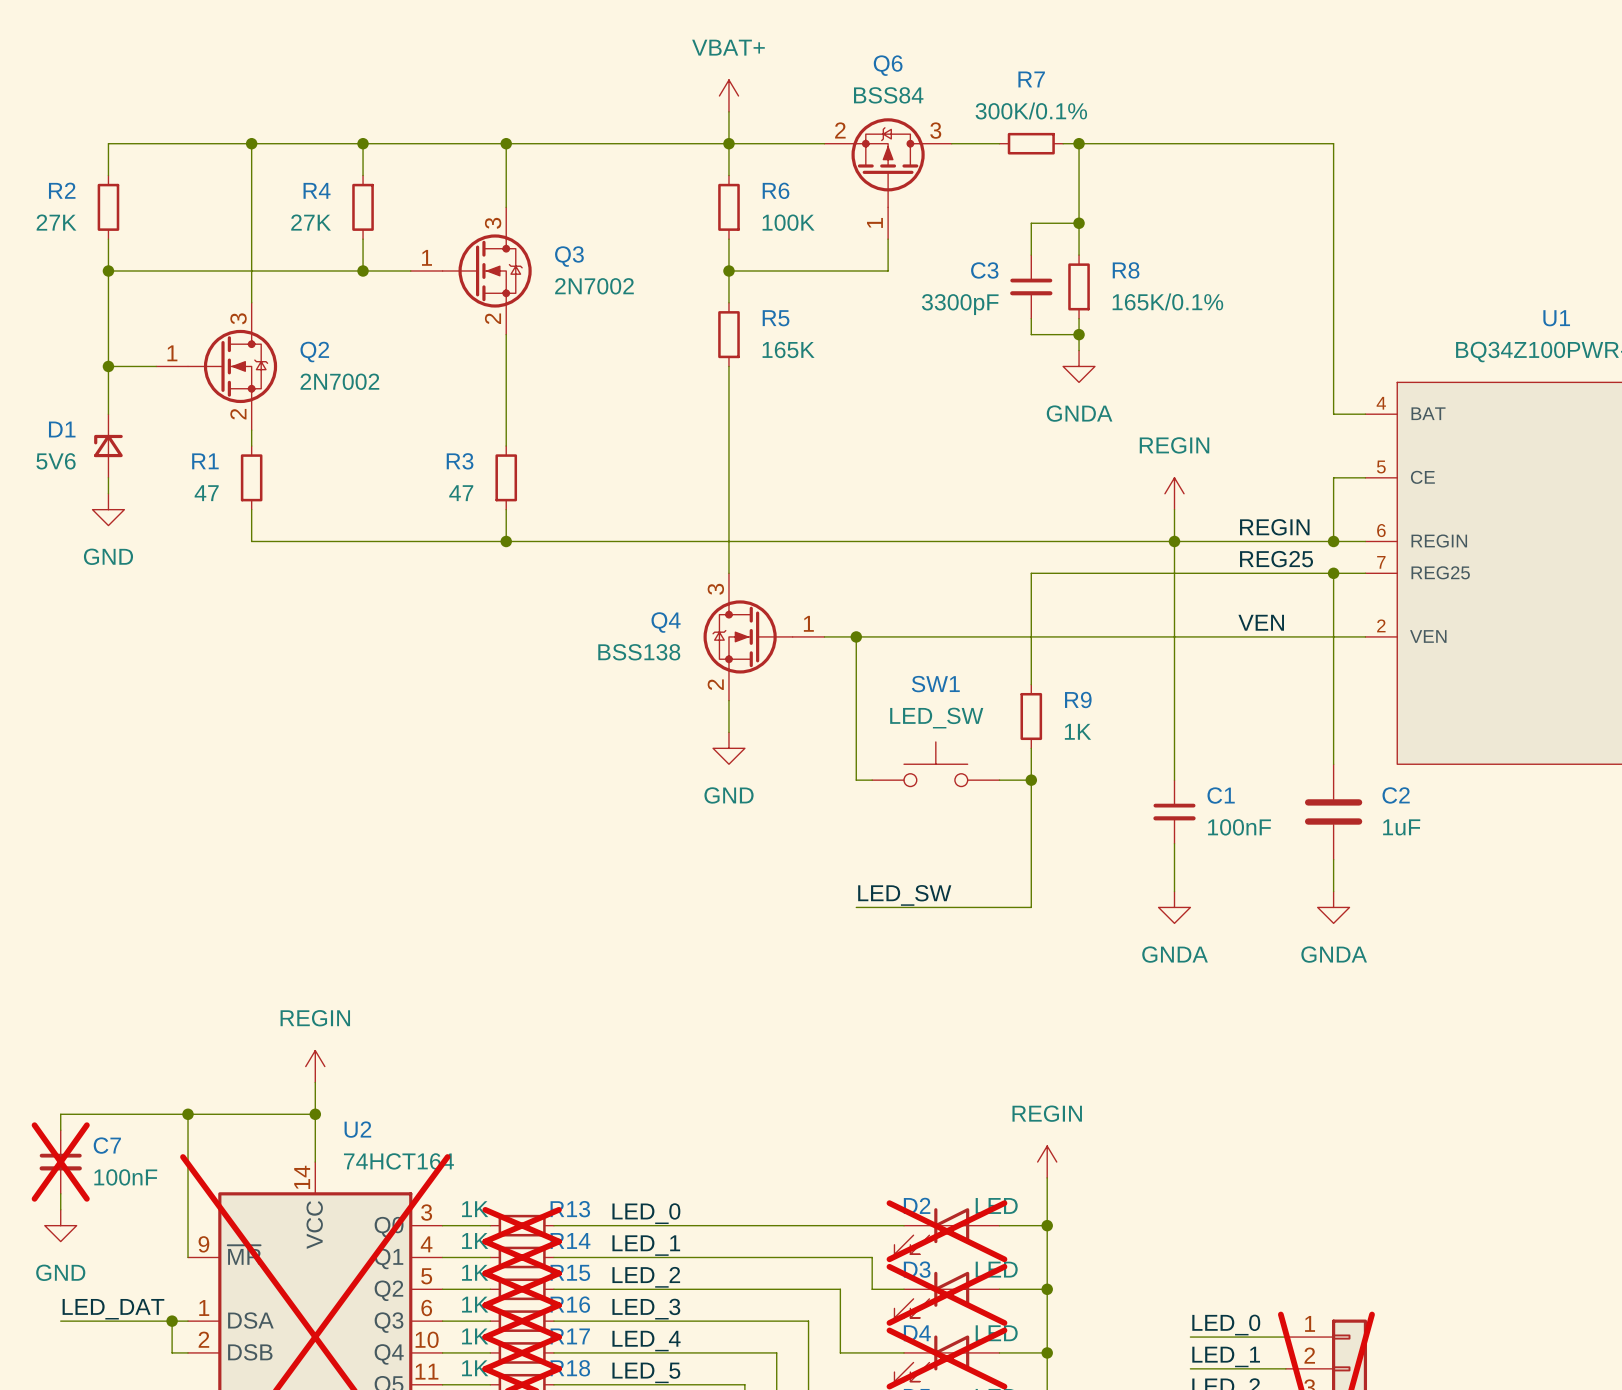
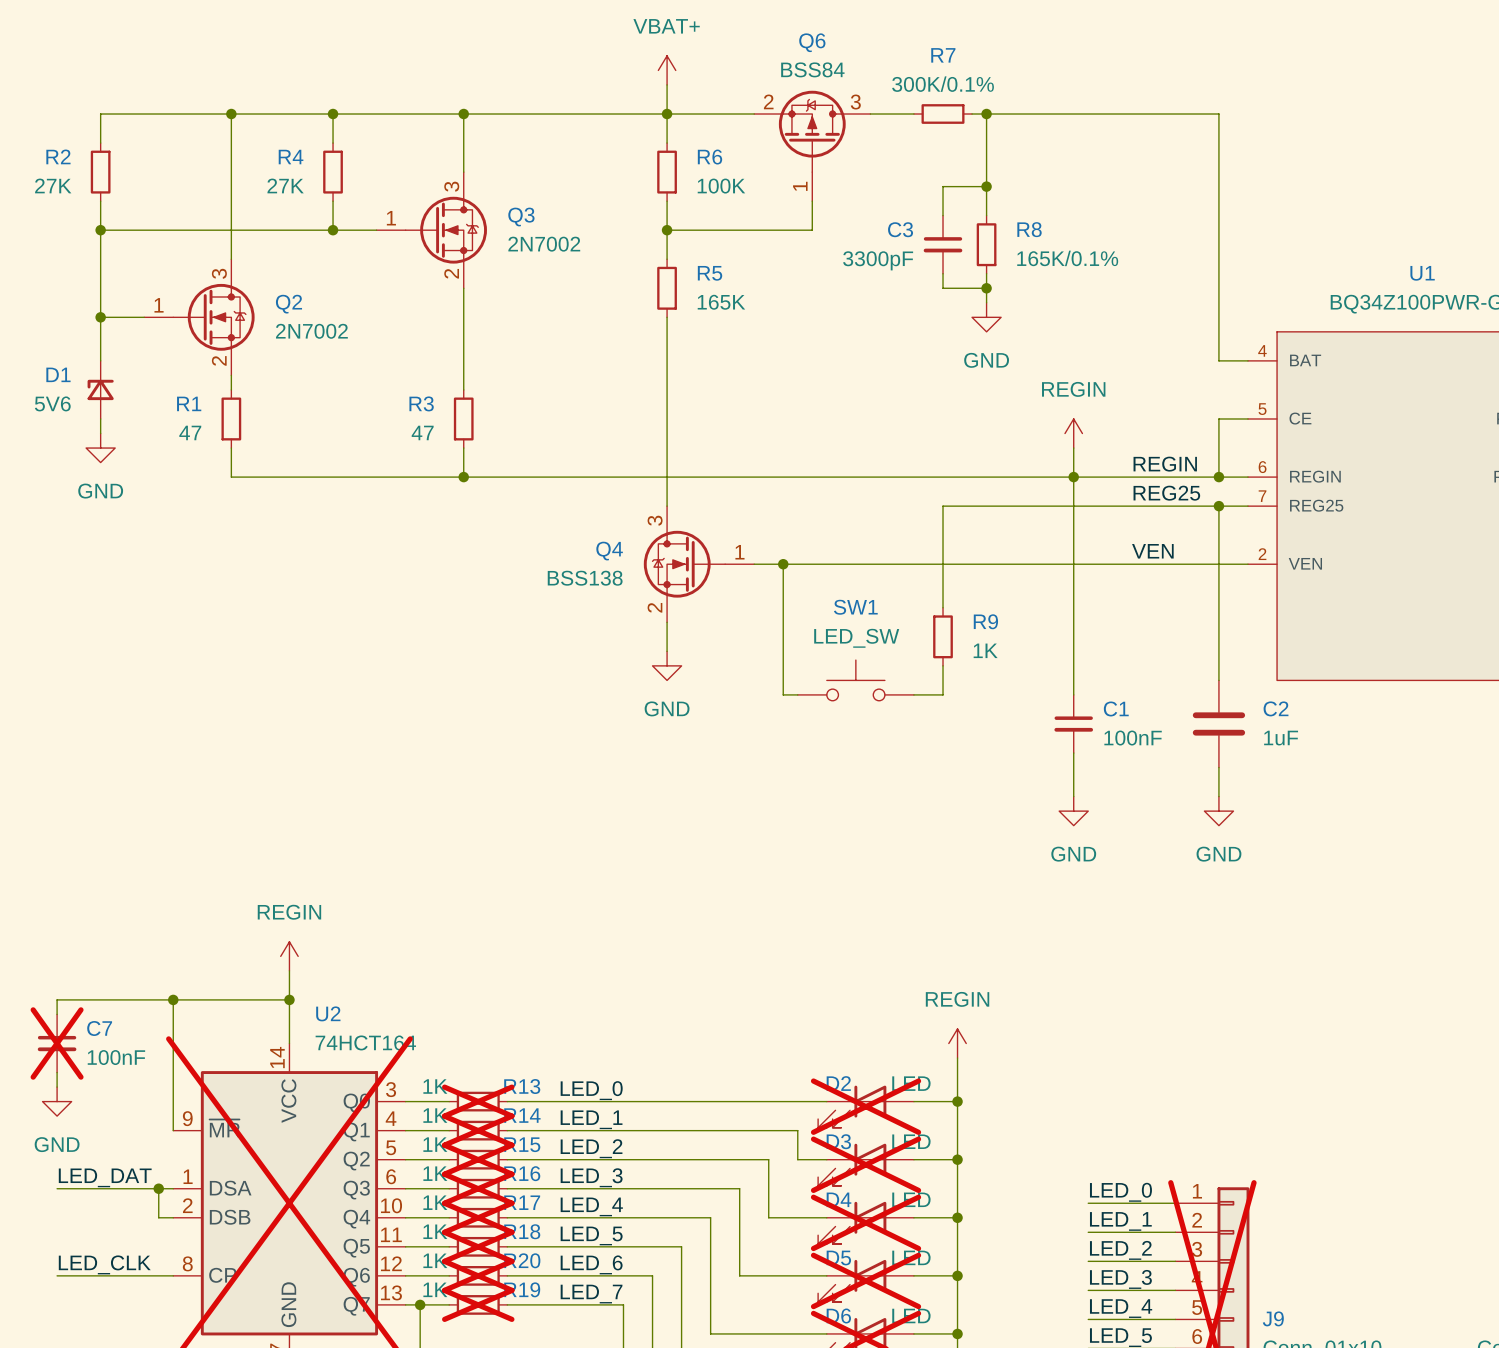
power symbol: GNDA (1079, 366) -> GND (986, 317)
wire: (1031, 780) (1031, 907) (856, 907) -> none
junction: (1031, 780) -> none
label: LED_SW (904, 895) -> none
power symbol: GNDA (1174, 907) -> GND (1073, 811)
power symbol: GNDA (1333, 907) -> GND (1218, 811)

